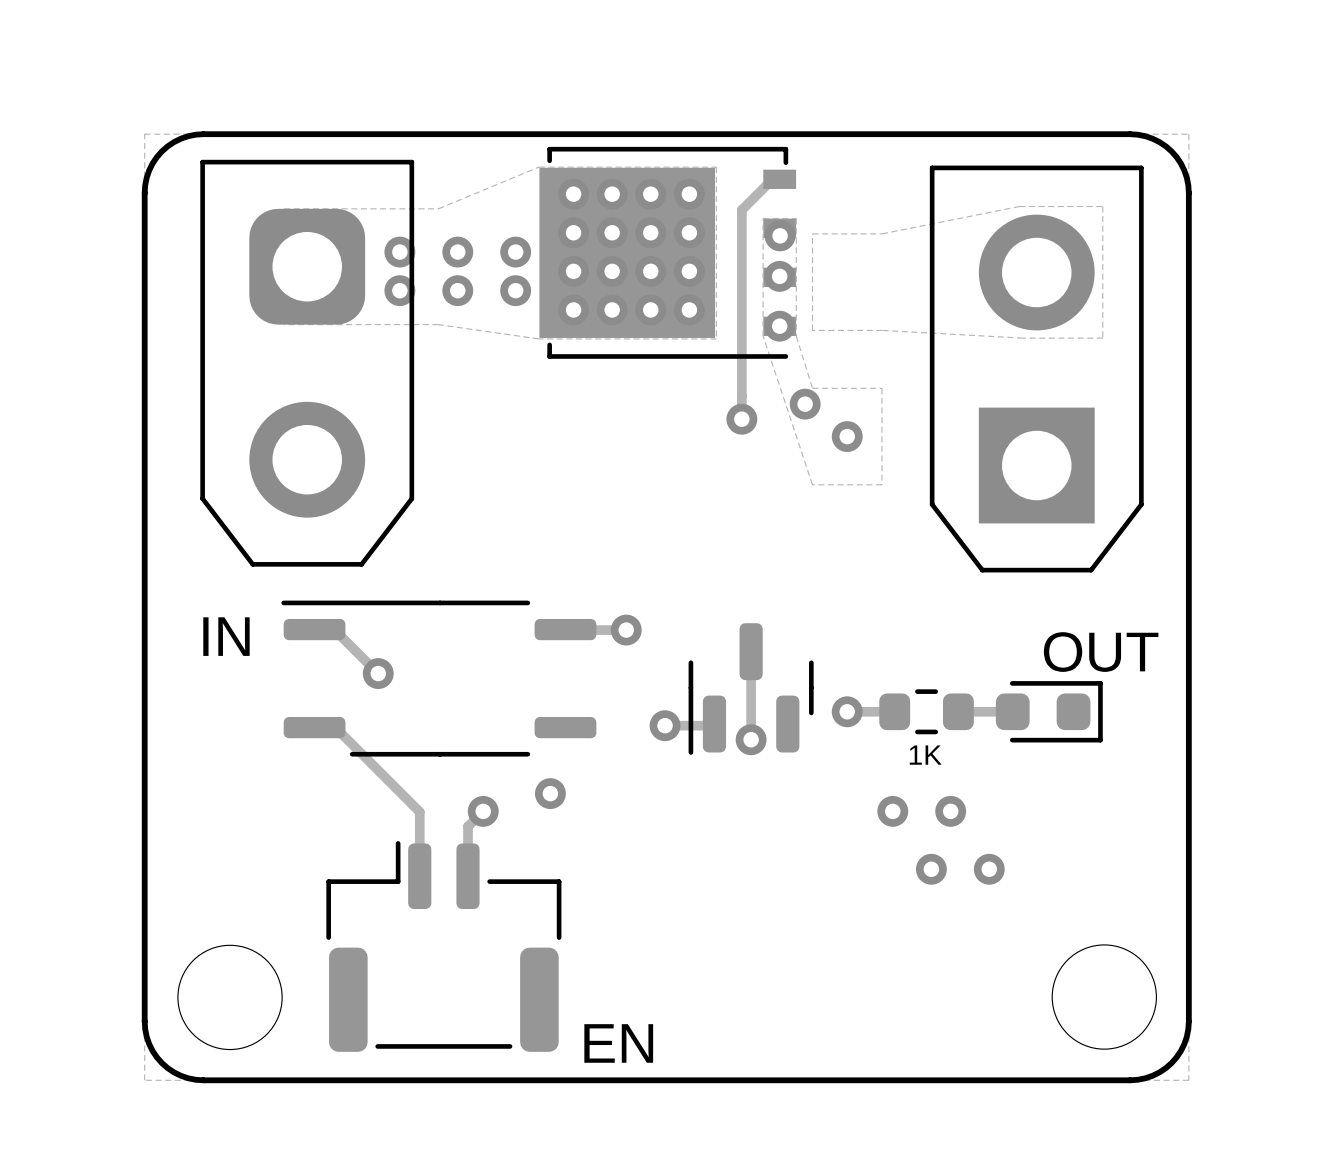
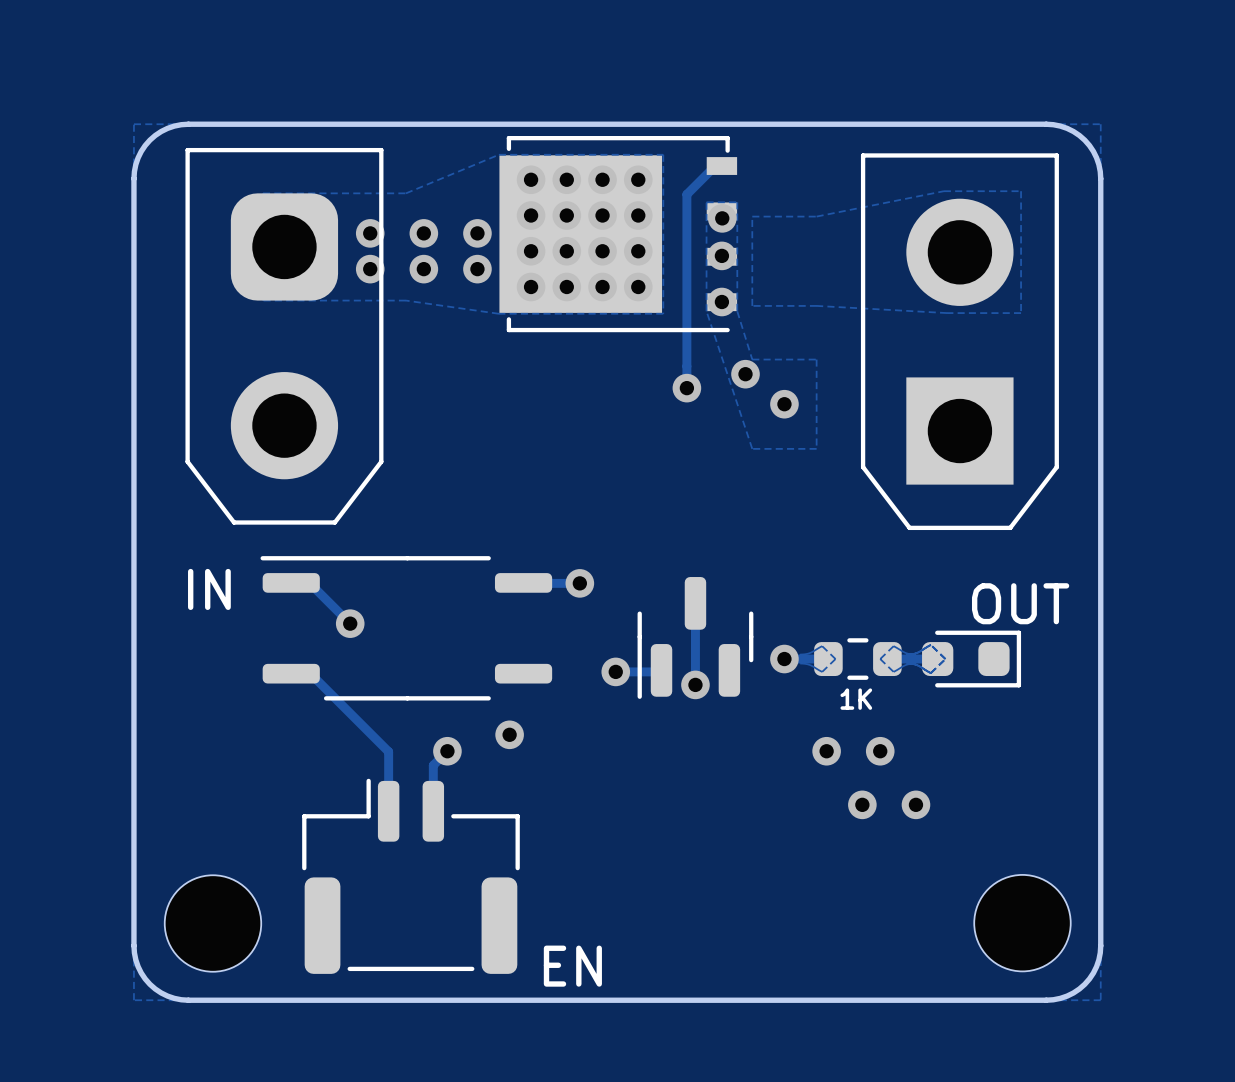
zone outline: none -> (930, 644) (945, 659) (930, 673) (917, 665) (906, 663) (906, 654) (917, 652) (930, 644)
zone outline: none -> (822, 646) (835, 659) (822, 671) (810, 665) (800, 663) (800, 654) (810, 652) (822, 646)
zone outline: none -> (893, 646) (905, 652) (915, 654) (915, 663) (905, 665) (893, 671) (880, 659) (893, 646)

